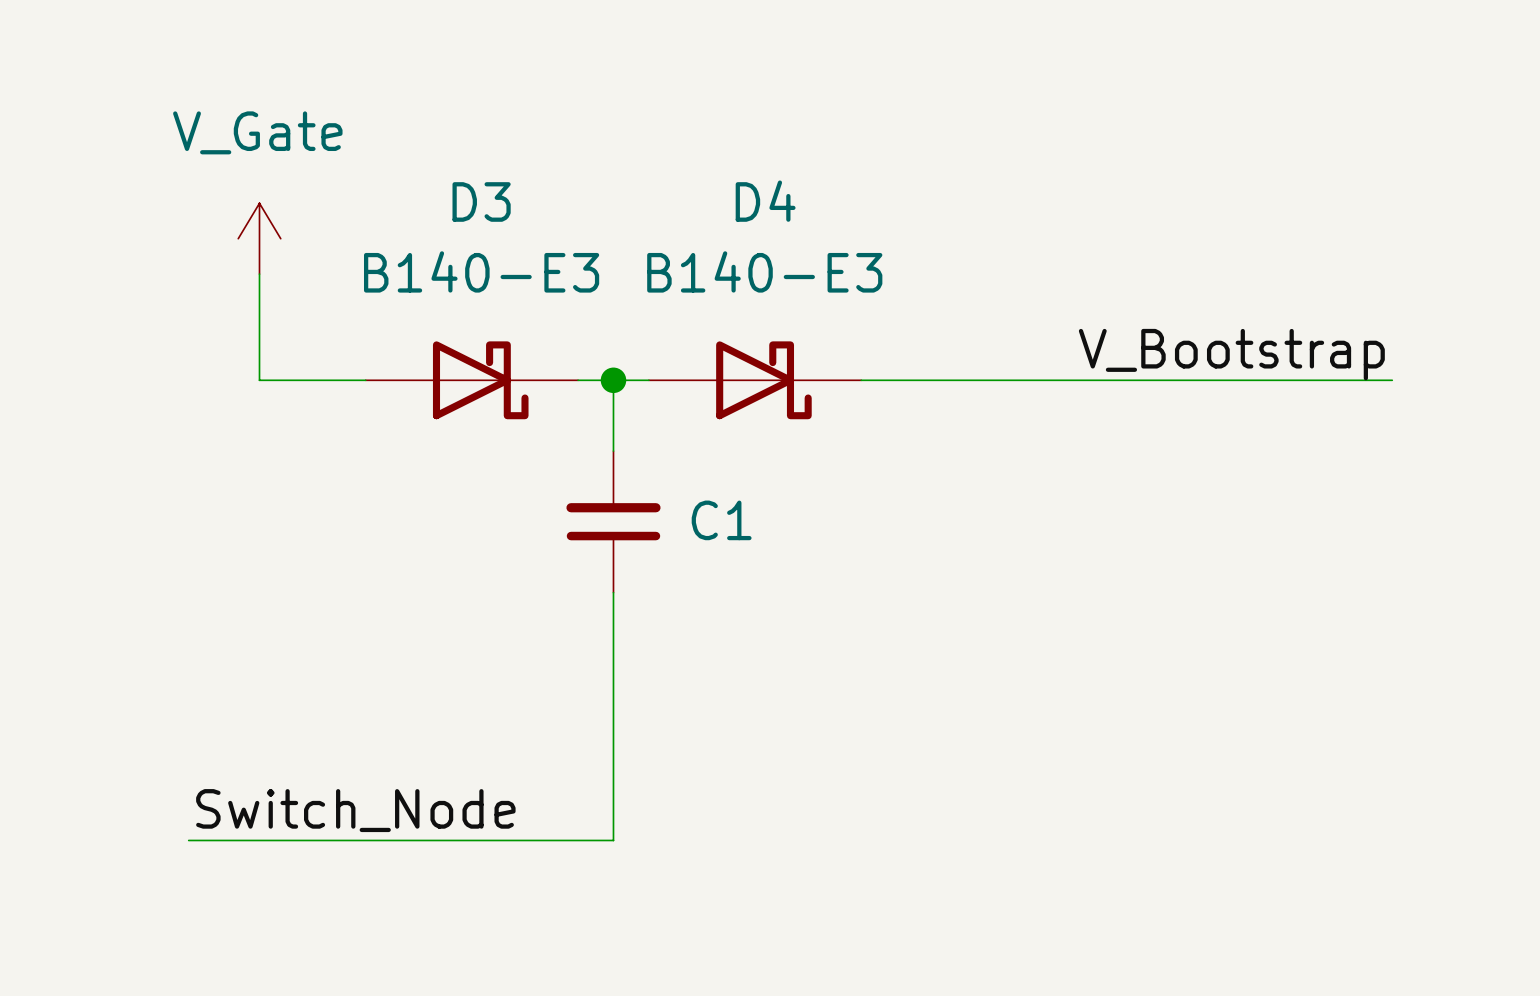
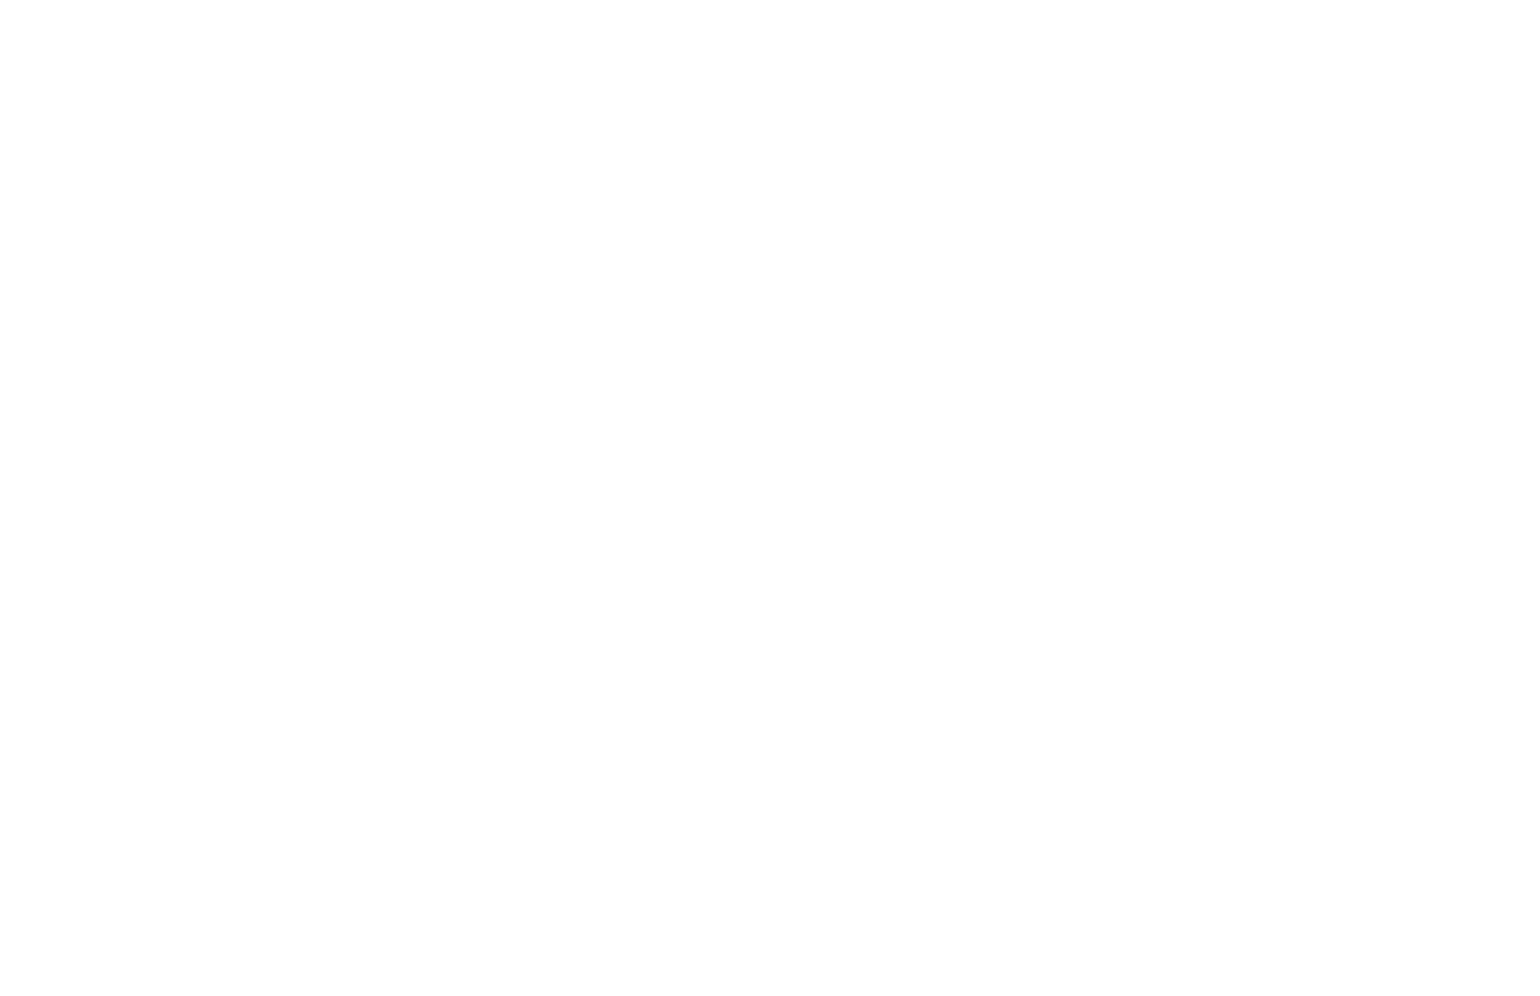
power symbol: V_Gate (259, 238) -> none
wire: (259, 274) (259, 380) (365, 380) -> none
label: V_Bootstrap (1231, 354) -> none
D3: B140-E3 (471, 380) -> none
wire: (578, 380) (648, 380) -> none
wire: (613, 380) (613, 451) -> none
junction: (613, 380) -> none
D4: B140-E3 (755, 380) -> none
wire: (861, 380) (1392, 380) -> none
C1: (613, 521) -> none
wire: (613, 592) (613, 840) (188, 840) -> none
label: Switch_Node (355, 810) -> none

